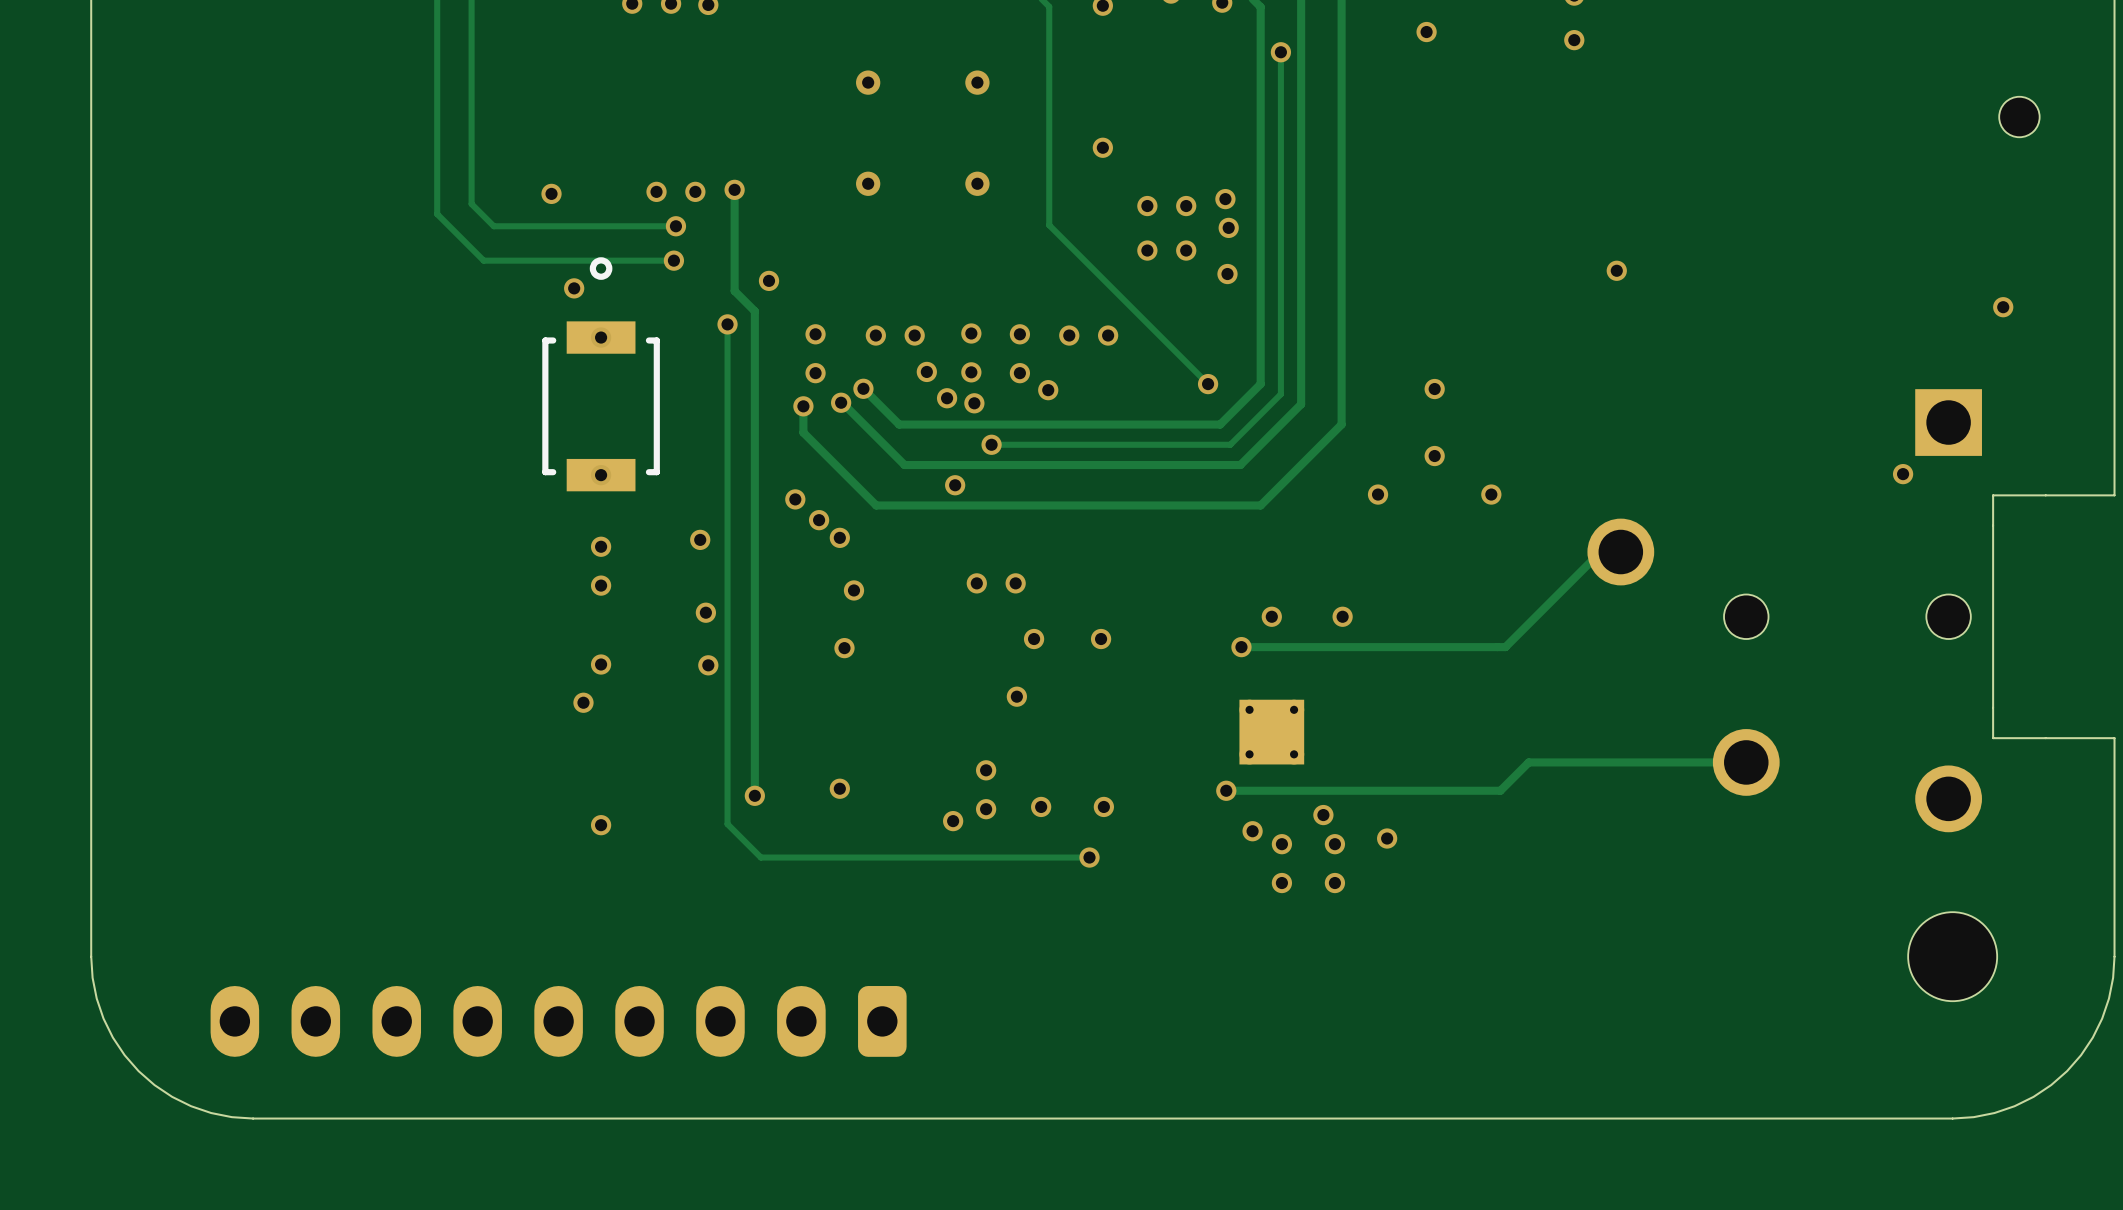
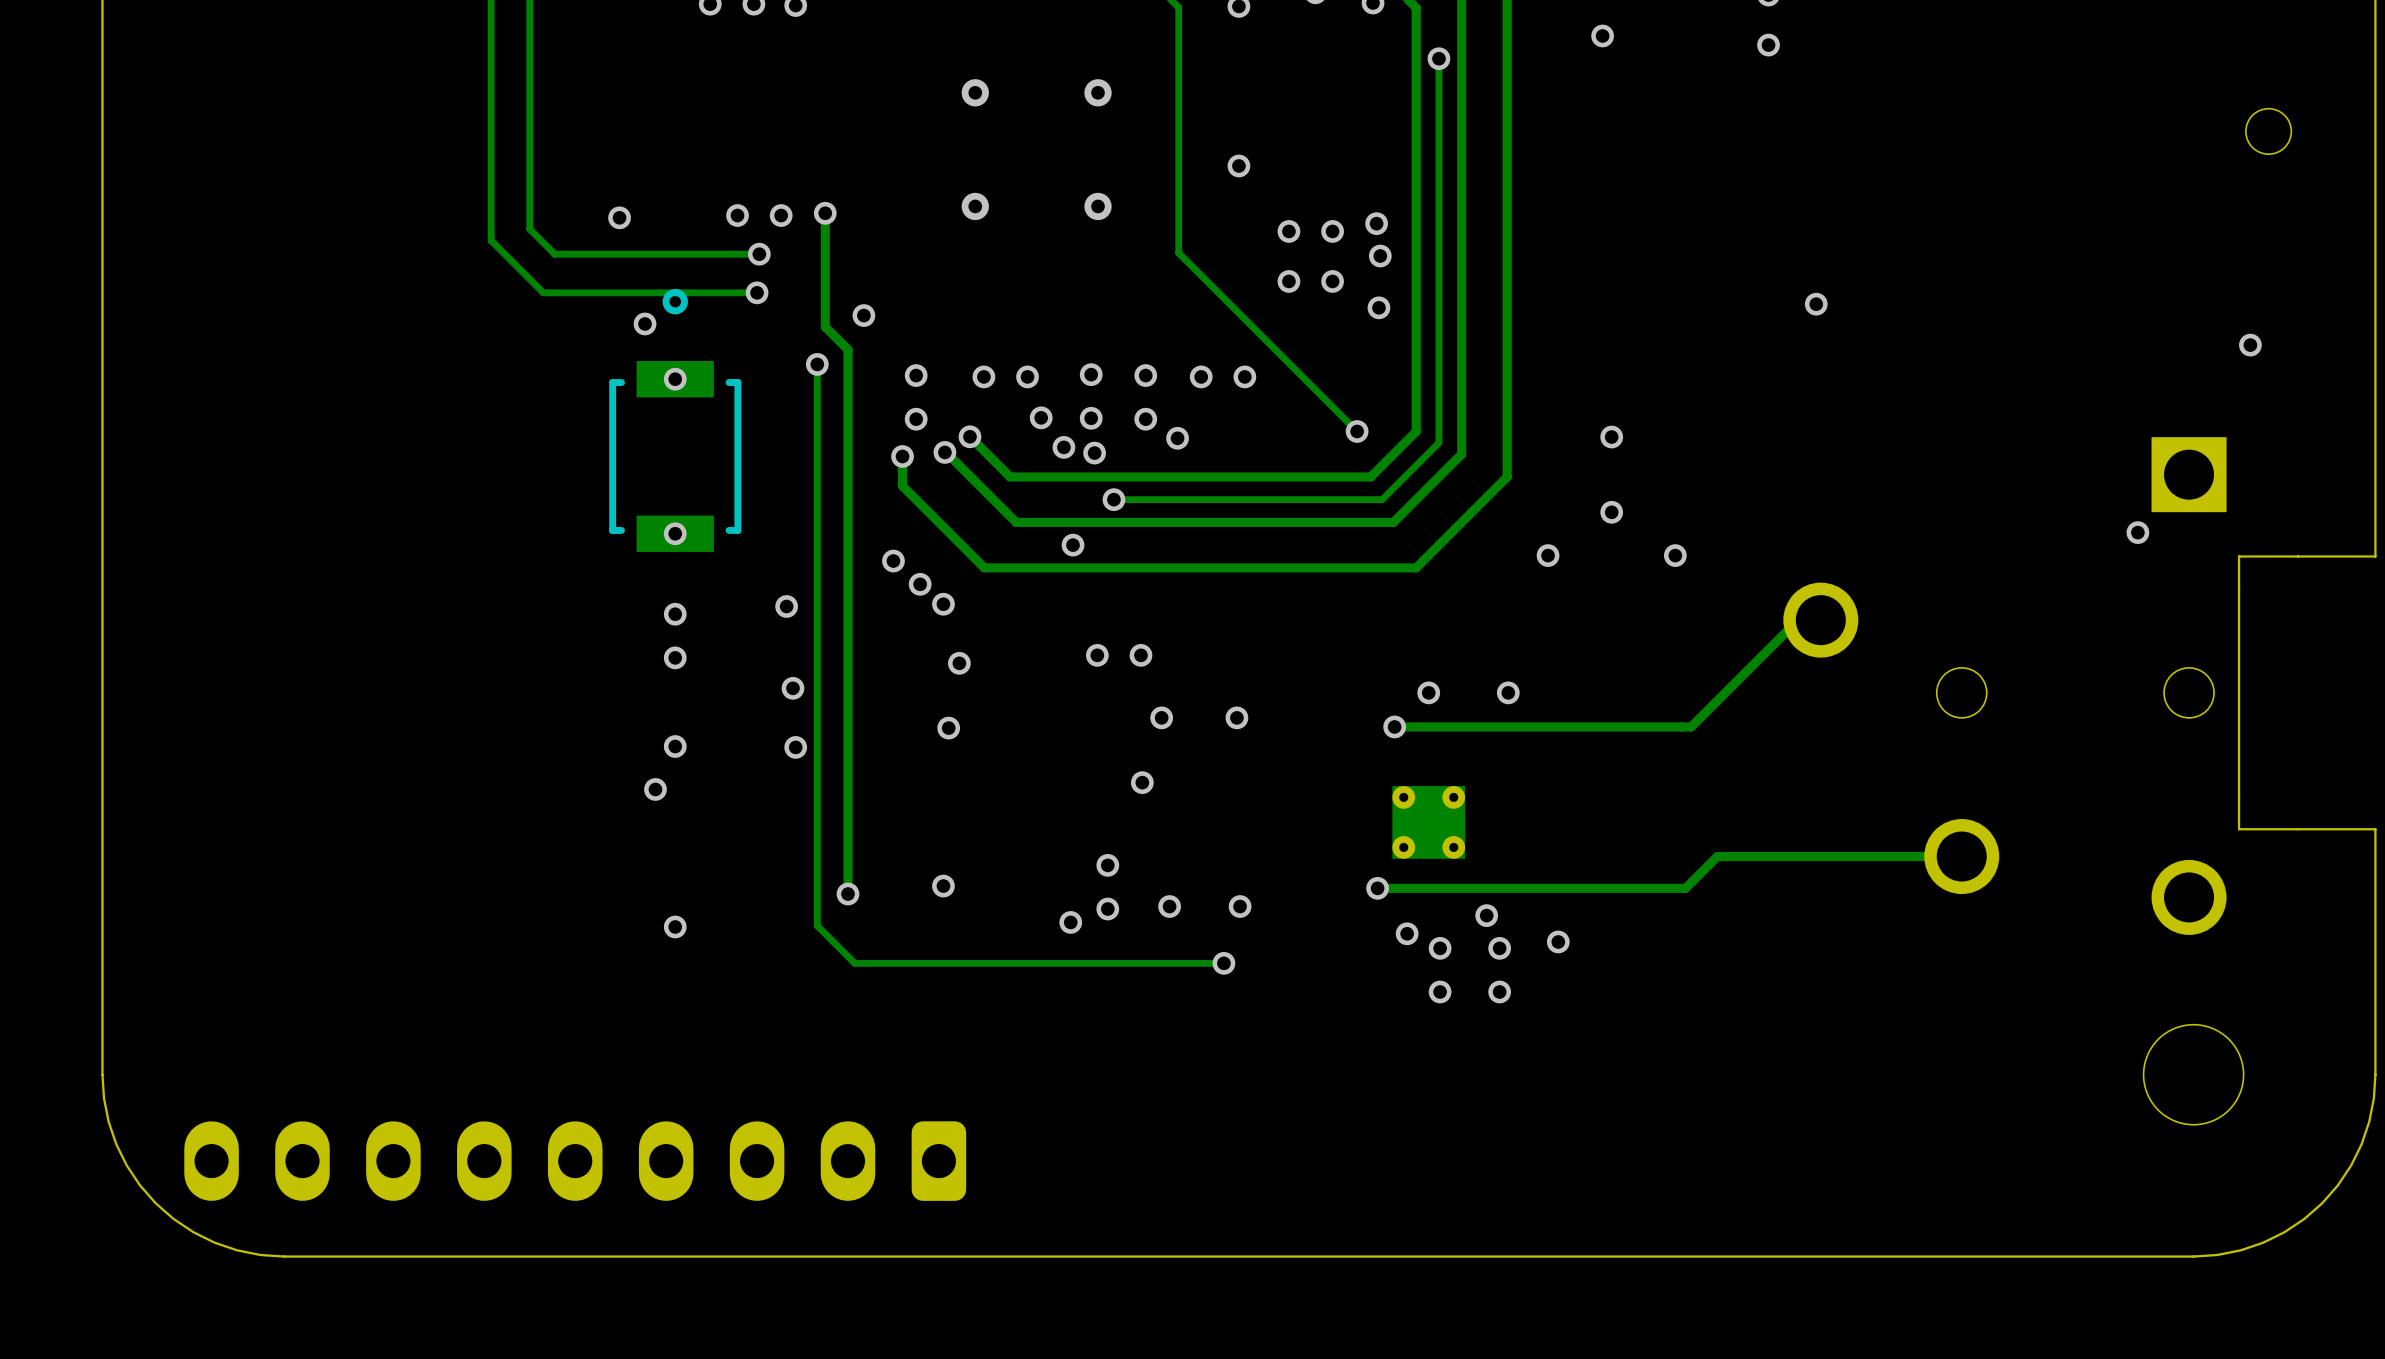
track: none -> (754, 1131) (759, 1136)
part position: (558, 1021) -> (575, 1161)

